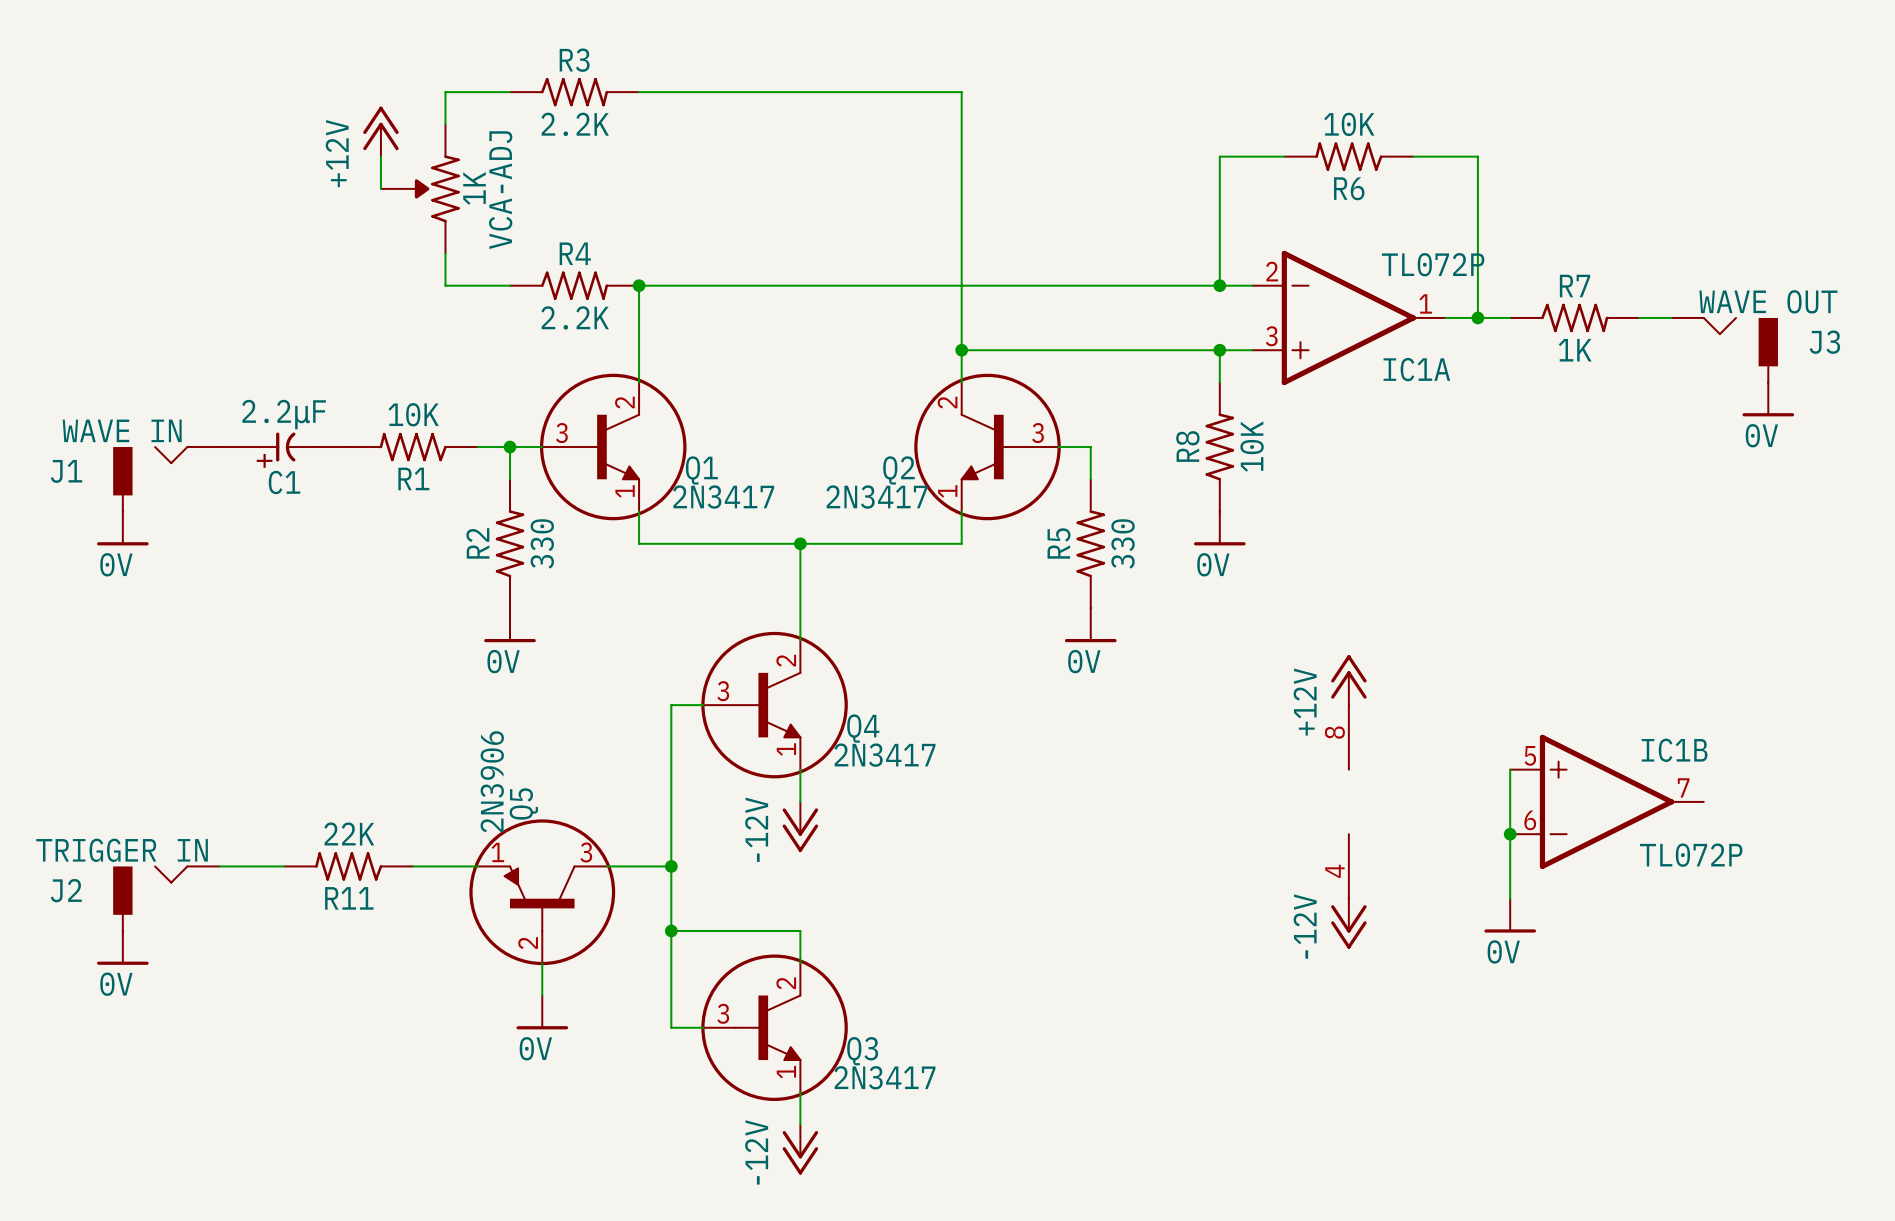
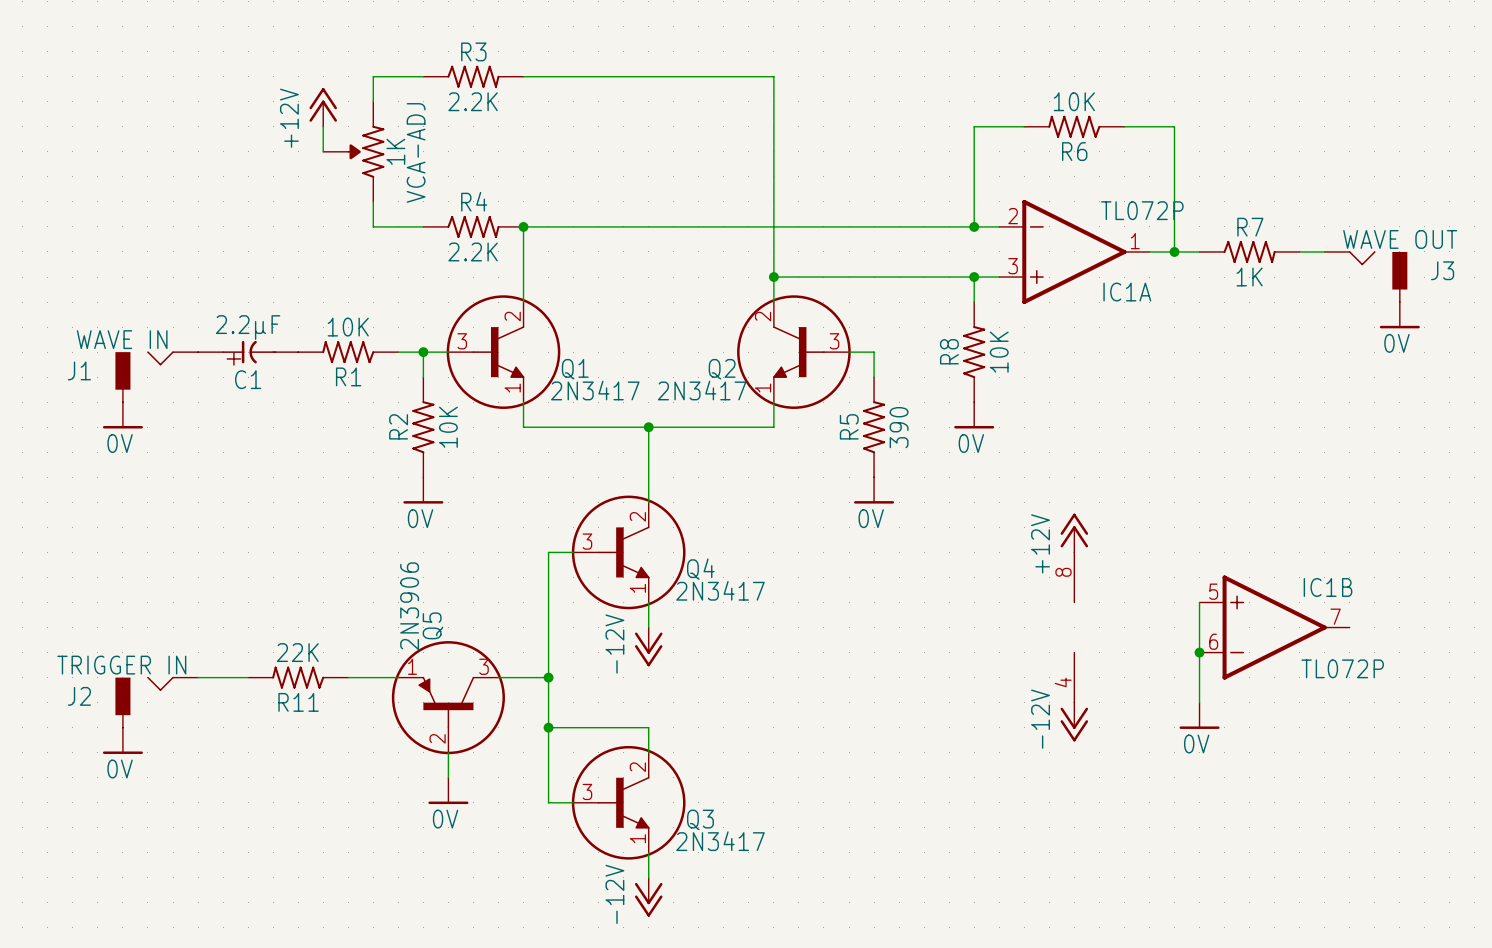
R2 value: 330 (542, 543) -> 10K (448, 427)
R5 value: 330 (1123, 543) -> 390 (899, 427)

